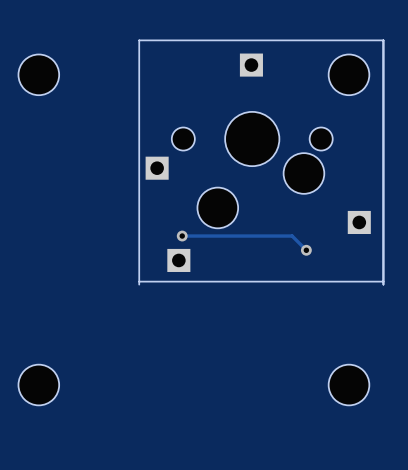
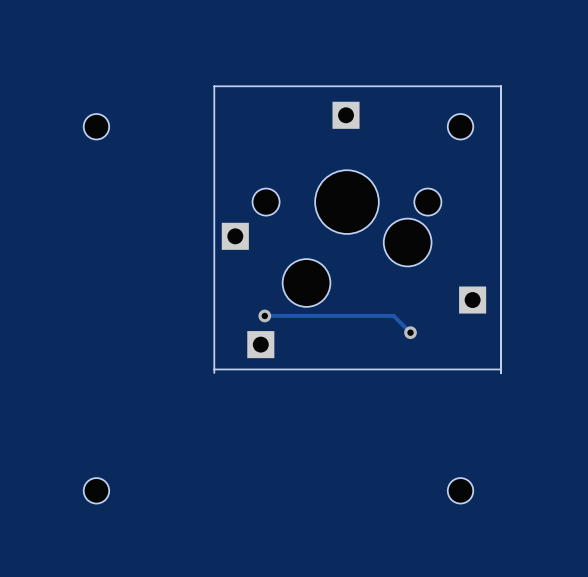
part footprint: [18, 54, 60, 96] -> [83, 114, 110, 140]
part footprint: [328, 54, 370, 96] -> [447, 114, 474, 140]
part footprint: [18, 364, 60, 406] -> [83, 478, 110, 504]
part footprint: [328, 364, 370, 406] -> [447, 478, 474, 504]

